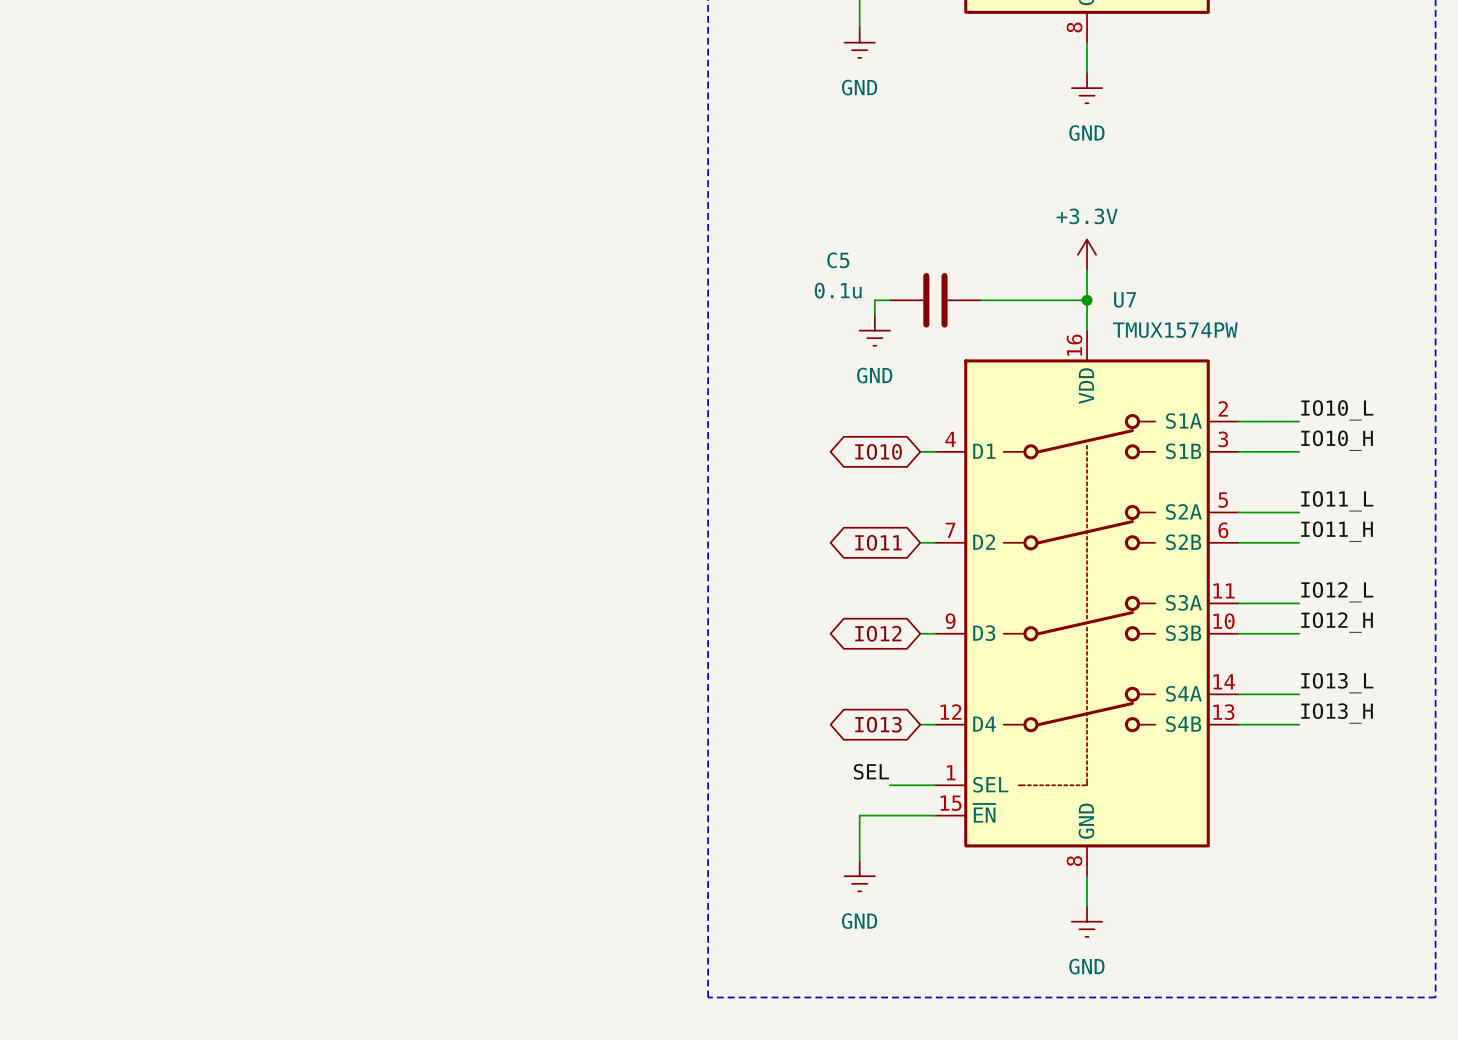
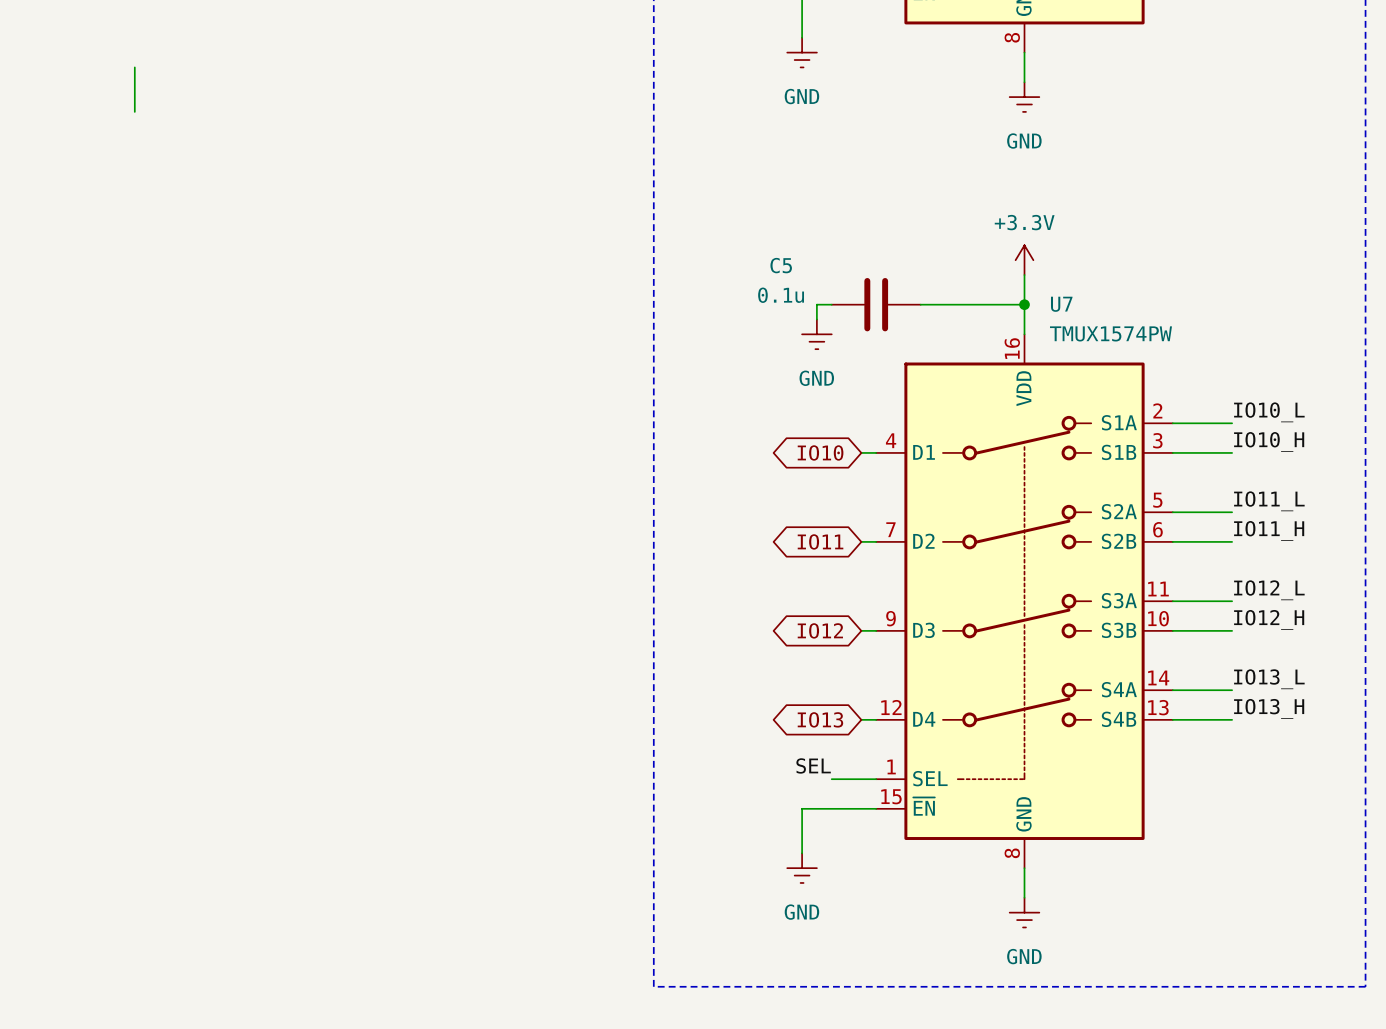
wire: none -> (134, 67) (134, 111)

